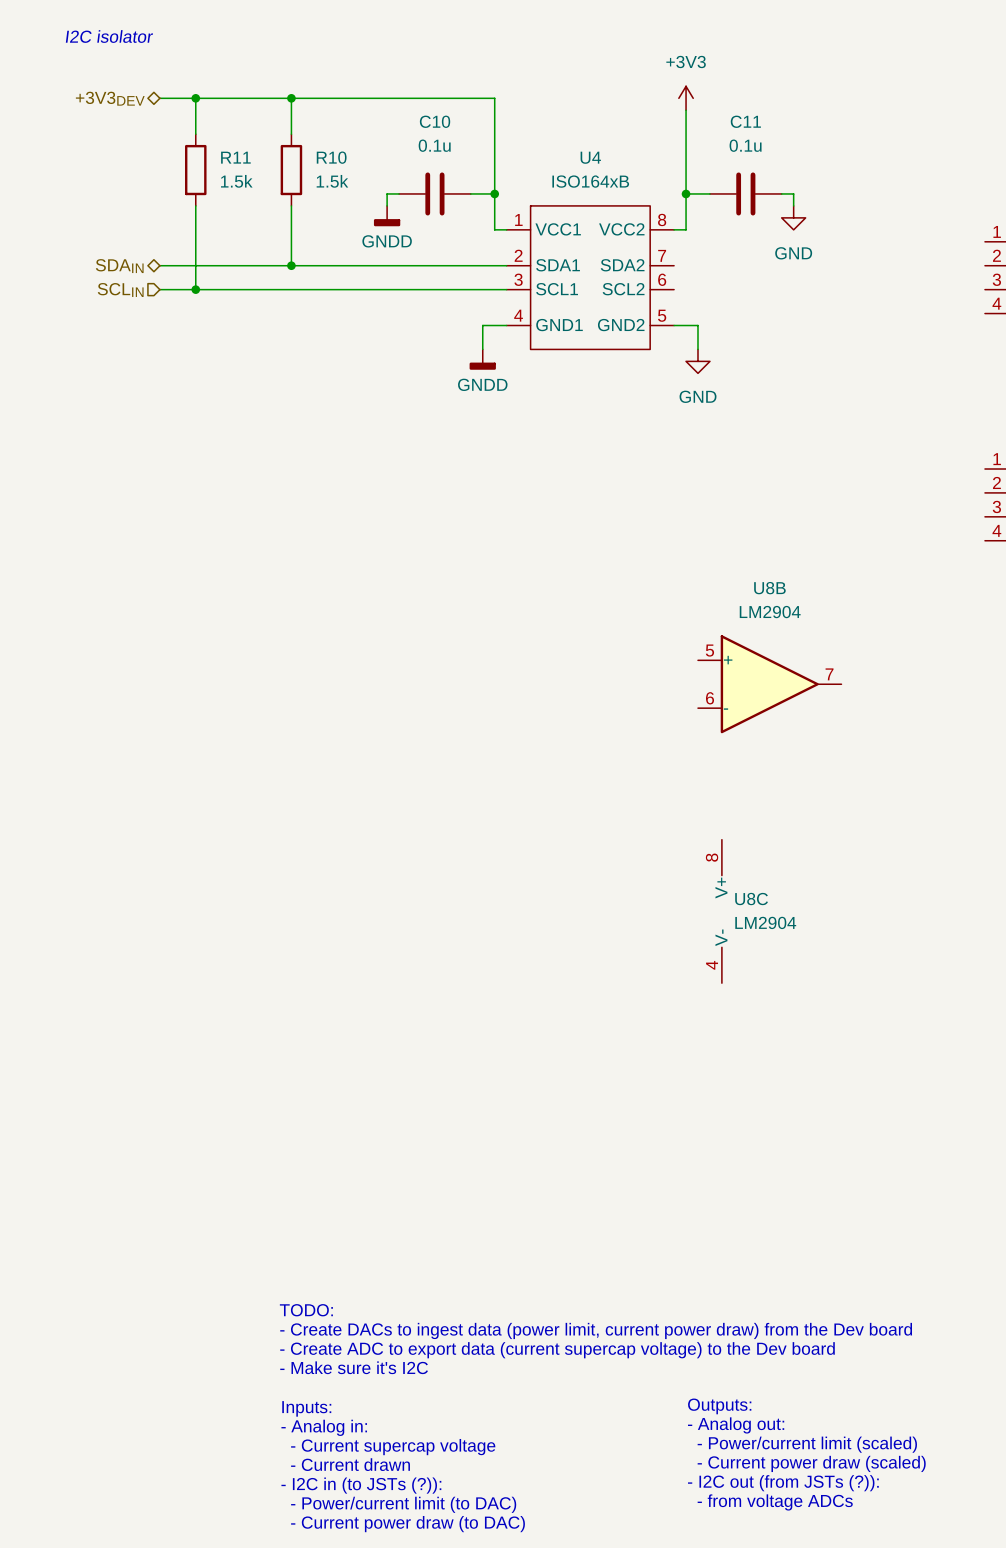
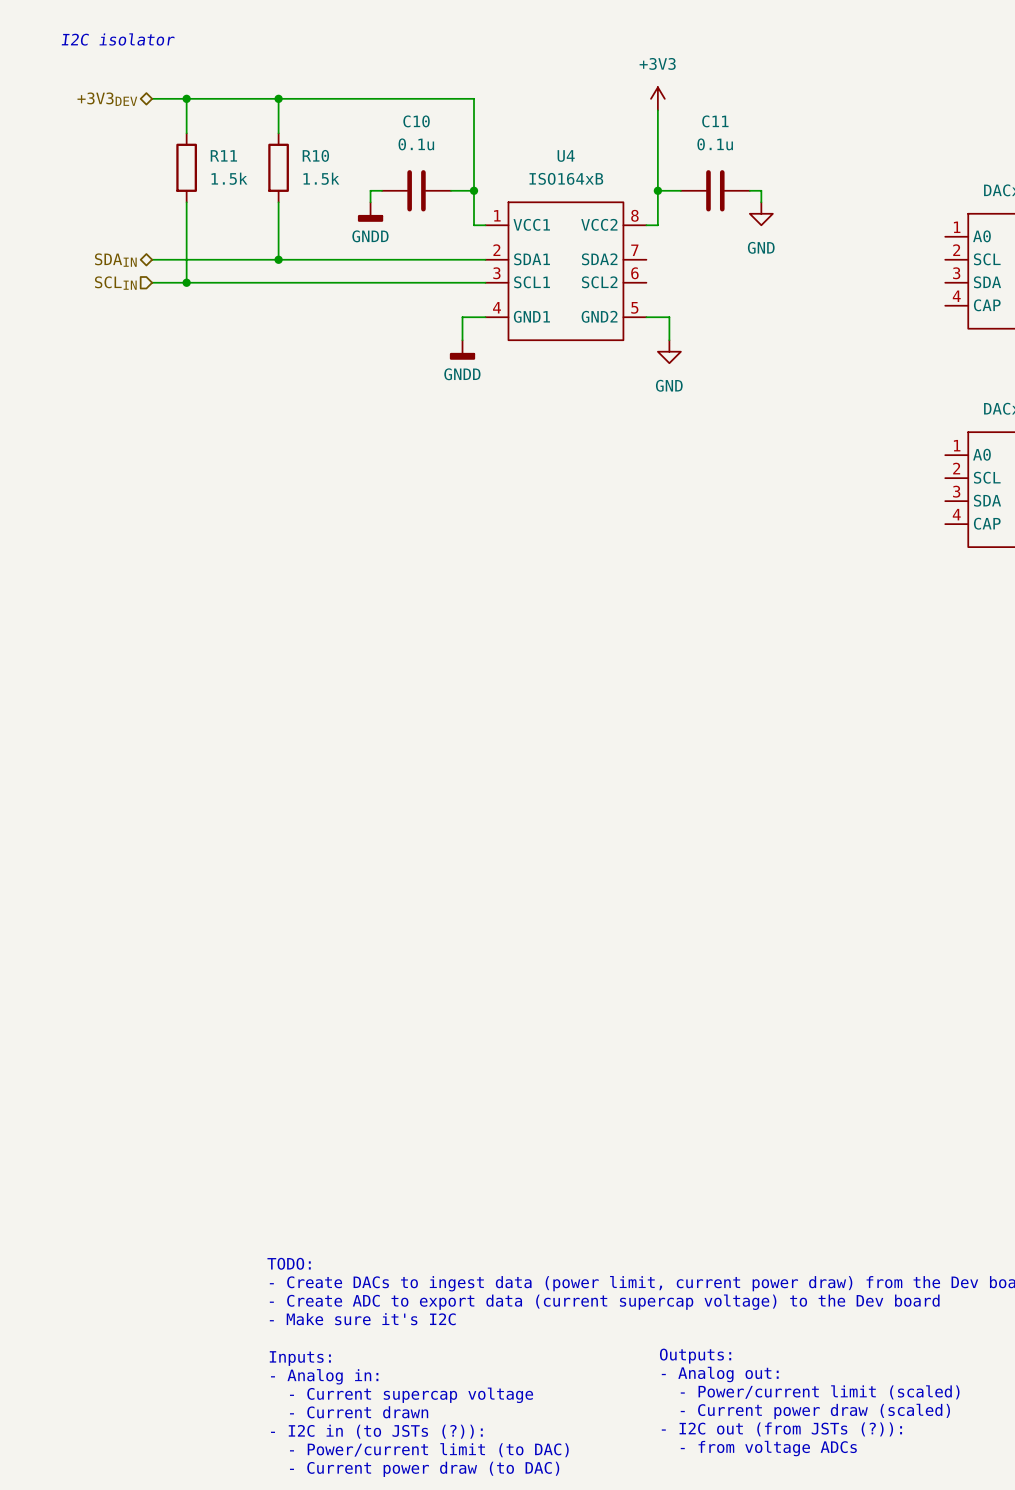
U8B: LM2904 (769, 684) -> none
U8C: LM2904 (721, 911) -> none

